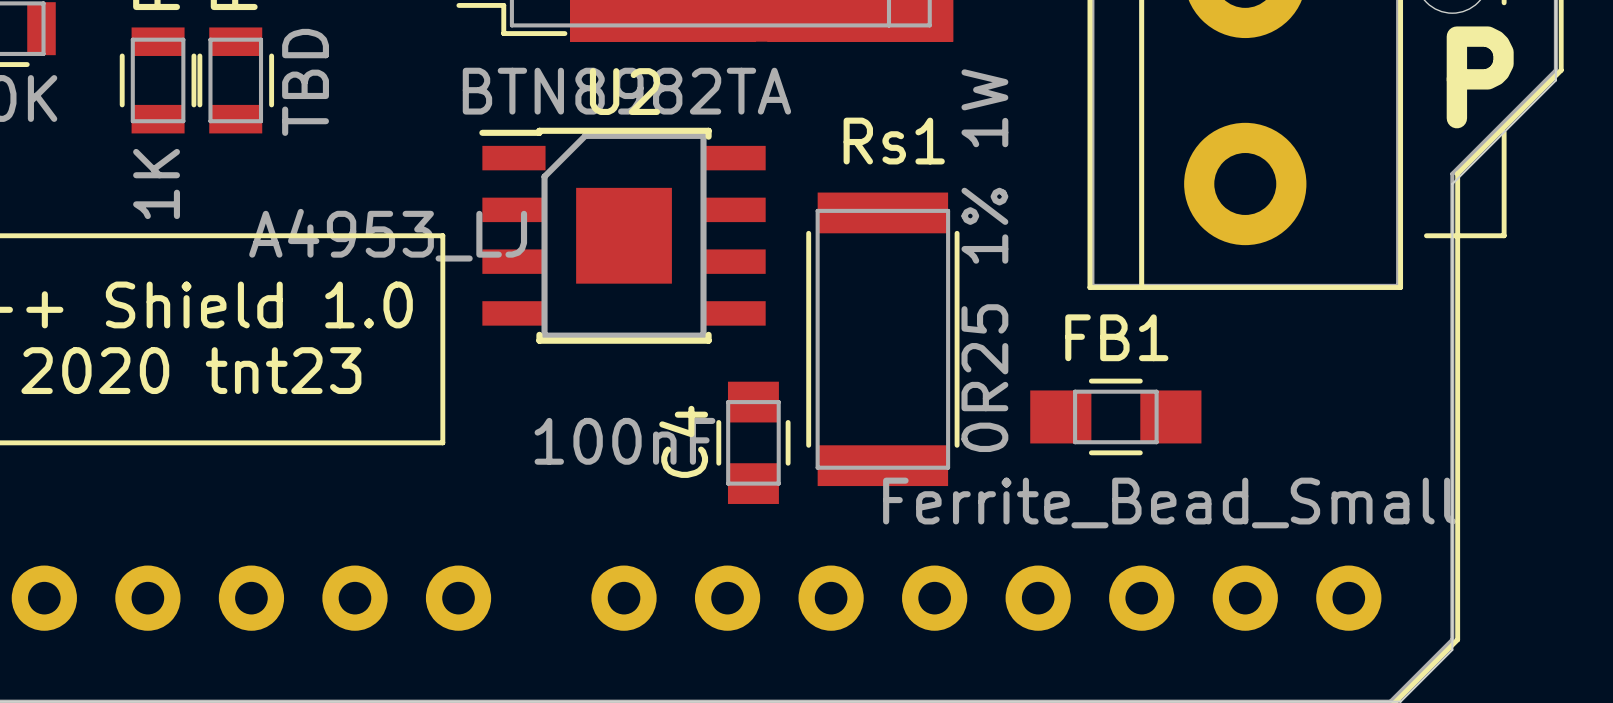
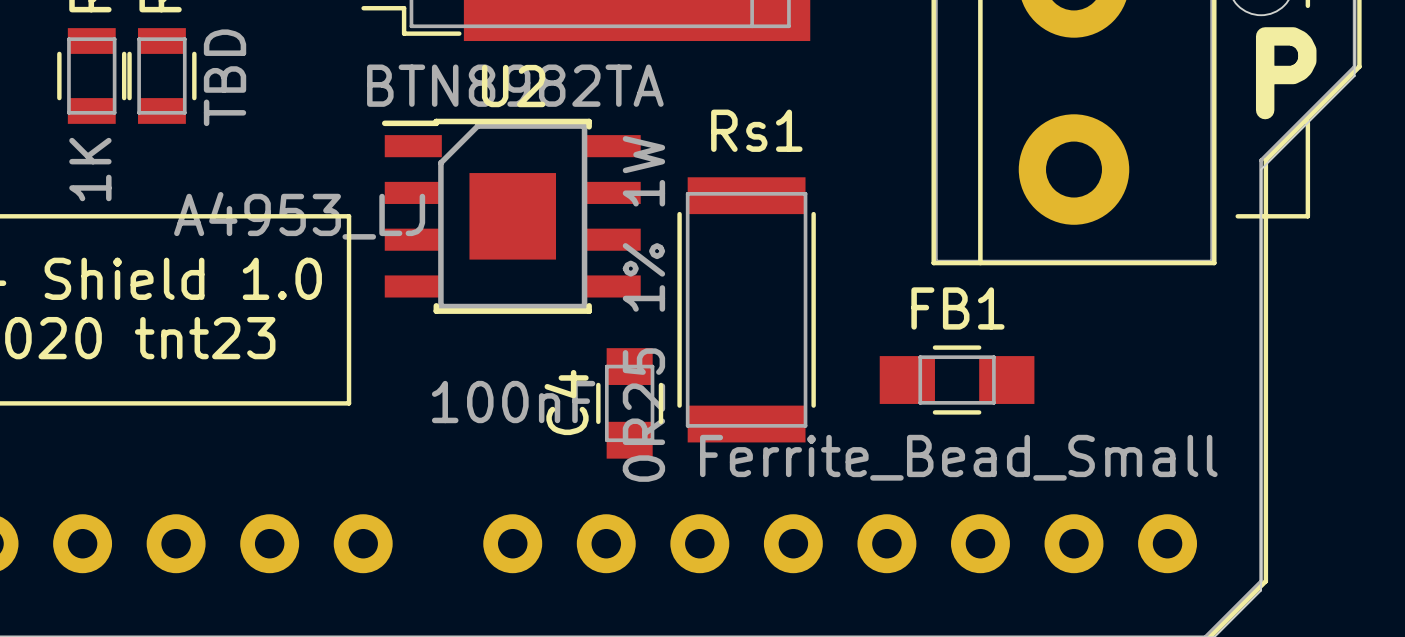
Rs1 value position: 0R25 1% 1W (984, 260) -> 0R25 1% 1W (643, 308)
FB1 value position: Ferrite_Bead_Small (1169, 502) -> Ferrite_Bead_Small (958, 457)

